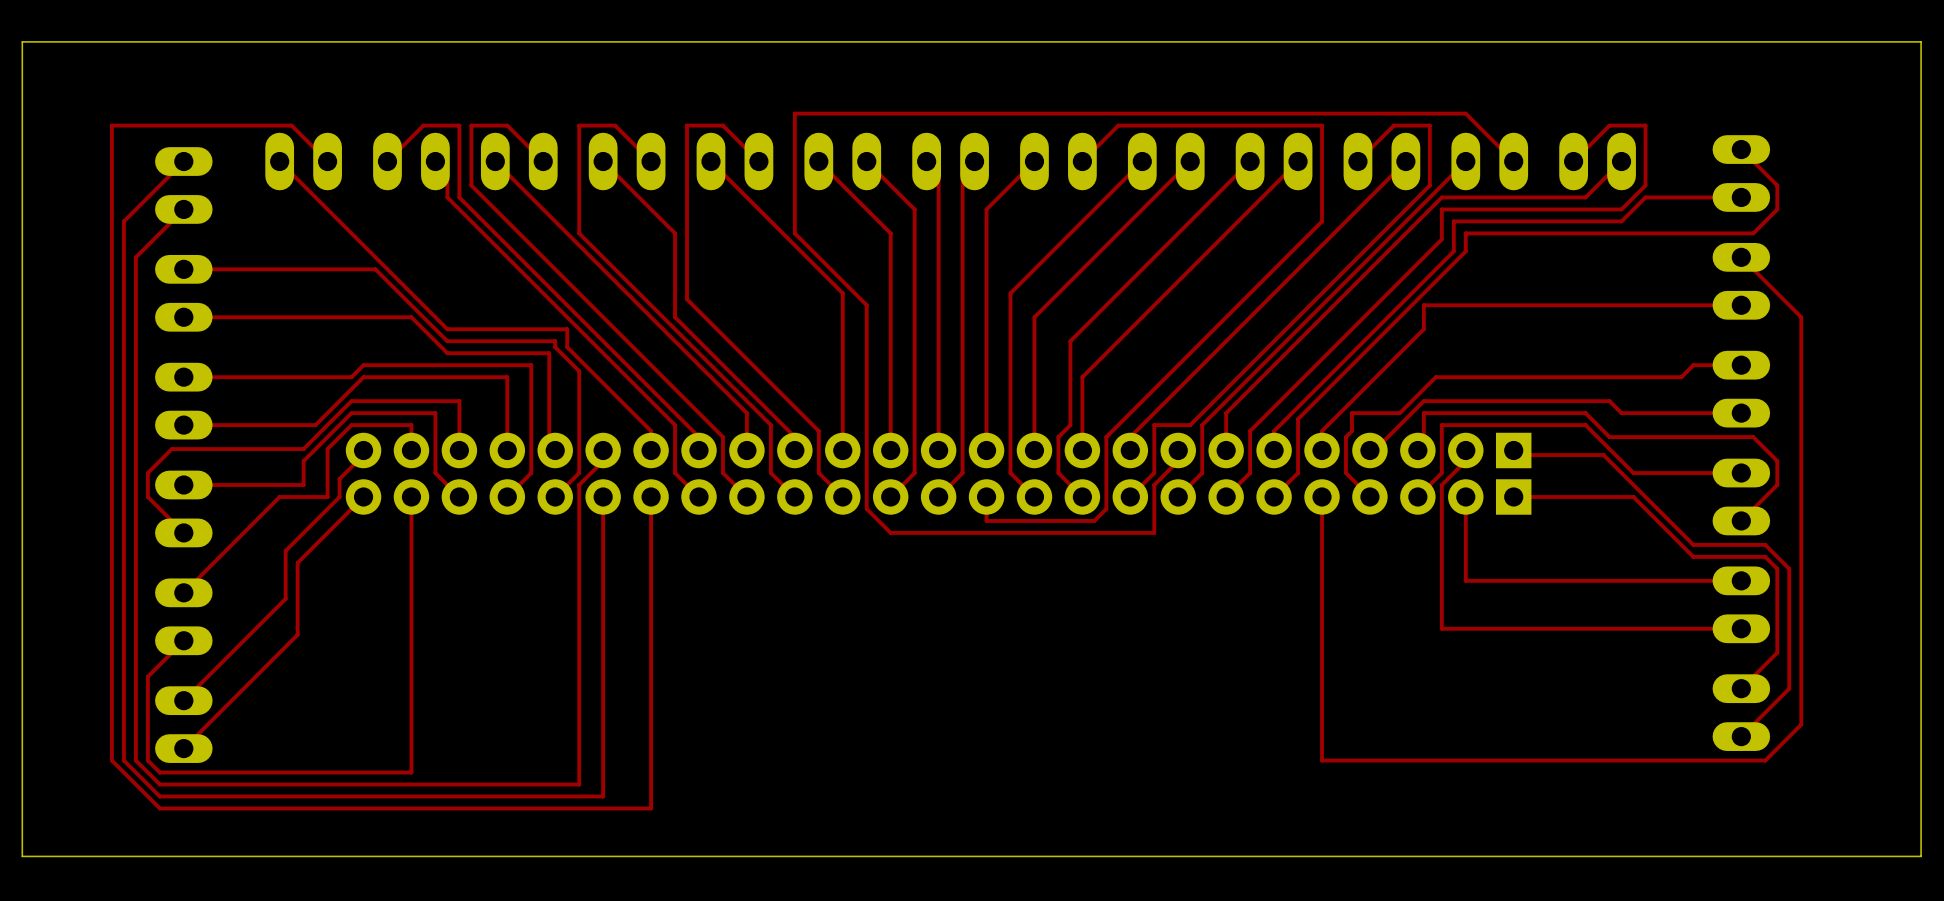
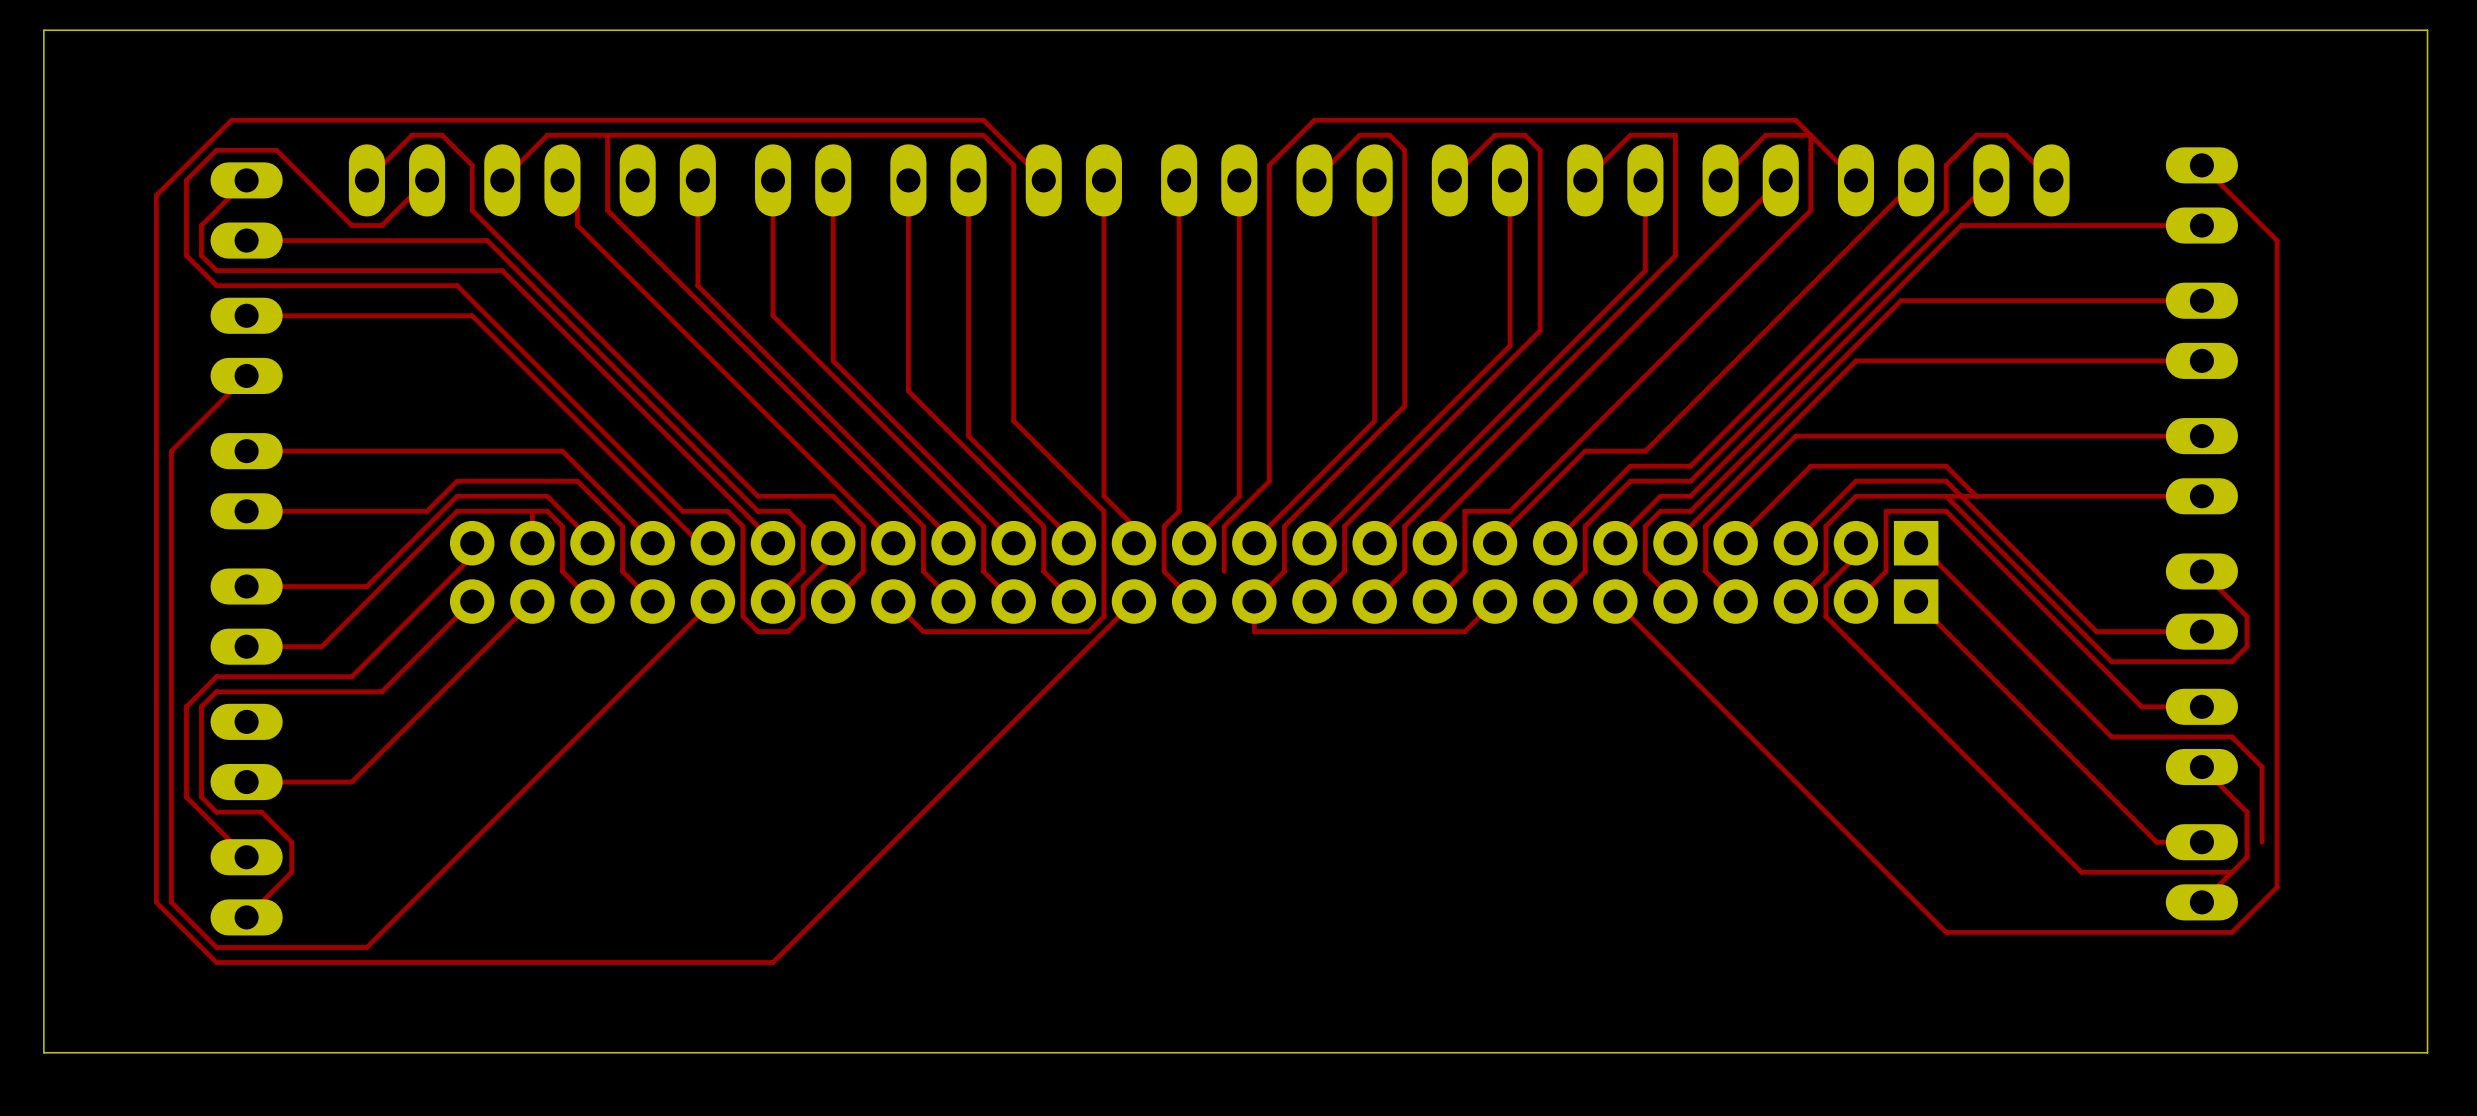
top track: (1034, 113) (794, 113) (794, 149) -> (1314, 120) (1269, 165) (1269, 481) (1224, 526)
top track: (1417, 113) (1465, 113) (1513, 161) -> (1795, 120) (1855, 180)
top track: (459, 125) (459, 197) (699, 437) (699, 449) -> (592, 135) (607, 135)
top track: (507, 125) (543, 161) -> (652, 135) (742, 135)
top track: (579, 125) (579, 233) (651, 305) -> (833, 180) (833, 360)
top track: (615, 125) (651, 161) -> (788, 135) (878, 135)
top track: (687, 125) (687, 299) (818, 431) (818, 437) -> none
top track: (722, 125) (758, 161) -> (923, 135) (983, 135) (1013, 165)
top track: (1178, 125) (1118, 125) (1082, 161) -> (1494, 135) (1449, 180)
top track: (1286, 125) (1202, 125) -> (1630, 135) (1585, 180)
top track: (279, 161) (447, 329) (567, 329) (567, 347) (651, 431) (651, 450) -> (366, 180) (412, 135) (442, 135) (472, 165) (472, 210) (758, 496) (833, 496) (863, 526)
top track: (327, 161) (291, 125) (111, 125) (111, 173) -> (427, 180) (381, 225) (351, 225) (276, 150) (216, 150) (186, 180) (186, 255) (216, 285) (457, 285) (487, 315)
top track: (495, 161) (603, 269) -> (773, 180) (773, 315)
top track: none -> (697, 180) (697, 285) (953, 541)
top track: (603, 161) (675, 233) (675, 317) (794, 437) (794, 449) -> none
top track: (710, 161) (842, 293) (842, 449) -> (908, 180) (908, 390) (1043, 526)
top track: none -> (968, 180) (968, 436) (1073, 541)
top track: (818, 161) (890, 233) (890, 437) -> (1043, 180) (983, 120) (231, 120) (156, 195)
top track: (866, 161) (914, 209) (914, 437) -> none
top track: (926, 161) (938, 173) (938, 449) -> (1179, 180) (1179, 511) (1164, 526)
top track: (974, 161) (962, 173) (962, 437) -> (1239, 180) (1239, 496) (1194, 541)
top track: (1034, 161) (986, 209) (986, 449) -> (1314, 180) (1359, 135) (1389, 135) (1404, 150) (1404, 406) (1284, 526)
top track: none -> (1374, 180) (1374, 421) (1254, 541)
top track: (1142, 161) (1010, 293) (1010, 437) -> none
top track: (1190, 161) (1034, 317) (1034, 449) -> (1510, 180) (1510, 345) (1314, 541)
top track: (1250, 161) (1070, 341) (1070, 425) -> (1525, 135) (1540, 150) (1540, 330) (1359, 511)
top track: (1298, 161) (1082, 377) (1082, 449) -> (1645, 180) (1645, 270) (1374, 541)
top track: (1465, 161) (1250, 377) -> (1916, 180) (1645, 451) (1585, 451)
top track: (1573, 161) (1609, 125) (1645, 125) (1645, 185) (1621, 209) (1441, 209) (1441, 239) (1250, 431) (1250, 437) -> (1991, 180) (1690, 481) (1630, 481) (1585, 526)
top track: (1621, 161) (1585, 197) -> (2081, 225) (2006, 225)
top track: none -> (2051, 180) (2006, 135) (1976, 135) (1946, 165) (1946, 210) (1690, 466) (1630, 466) (1555, 541)
top track: (1777, 185) (1777, 209) (1753, 233) (1465, 233) (1465, 251) (1298, 419) (1298, 437) -> (2201, 300) (1901, 300) (1690, 511) (1660, 511) (1645, 526)
top track: (147, 197) (123, 221) (123, 377) -> (246, 375) (171, 451)
top track: (1549, 197) (1441, 197) (1226, 413) (1226, 449) -> (1961, 225) (1690, 496) (1660, 496) (1615, 541)
top track: (1645, 197) (1621, 221) (1453, 221) (1453, 251) (1274, 431) (1274, 449) -> none
top track: (183, 209) (135, 257) (135, 580) -> (246, 240) (487, 240) (758, 511) (788, 511) (803, 526) (803, 571) (773, 601)
top track: (794, 233) (866, 305) -> (1103, 180) (1103, 360)
top track: none -> (1013, 270) (1013, 421) (1103, 511)
top track: (1741, 257) (1801, 317) -> (2247, 210) (2277, 240) (2277, 375)
top track: (375, 269) (363, 269) -> (532, 375) (472, 315)
top track: (1465, 305) (1423, 305) (1423, 329) (1322, 431) (1322, 449) -> (1855, 360) (1675, 541)
top track: (411, 317) (183, 317) -> none
top track: (447, 341) (555, 341) (555, 347) (579, 371) (579, 437) -> (577, 406) (682, 511) (727, 511) (742, 526)
top track: (447, 353) (549, 353) (549, 443) (555, 450) -> (577, 421) (712, 556) (712, 543)
top track: (1693, 365) (1681, 377) (1435, 377) (1399, 413) (1351, 413) (1351, 431) -> (2141, 436) (1795, 436) (1713, 518)
top track: (351, 377) (363, 365) (531, 365) (531, 473) (507, 496) -> (577, 481) (622, 526) (622, 571) (652, 601)
top track: (363, 377) (315, 425) -> (472, 451) (457, 451)
top track: (435, 377) (507, 377) (507, 449) -> (562, 451) (652, 541)
top track: (447, 401) (459, 401) (459, 449) -> (547, 496) (592, 541)
top track: (1465, 401) (1423, 401) (1369, 455) (1369, 450) -> (1976, 496) (1946, 466) (1810, 466) (1735, 543)
top track: (1537, 401) (1609, 401) (1621, 413) -> (2006, 496) (2051, 496)
top track: (423, 413) (435, 413) (435, 437) -> (532, 511) (547, 511) (562, 526)
top track: (746, 413) (746, 449) -> (953, 496) (983, 526)
top track: (866, 413) (866, 425) -> (1103, 496) (1134, 526)
top track: (1465, 413) (1423, 413) (1423, 443) -> (1855, 481) (1803, 533)
top track: (1585, 413) (1609, 437) (1753, 437) (1777, 461) (1777, 485) (1741, 520) -> (2096, 631) (2201, 631)
top track: (327, 425) (303, 449) (171, 449) (147, 473) (147, 496) (183, 532) -> (427, 511) (412, 511)
top track: (675, 425) (675, 437) -> (863, 511) (893, 541)
top track: (770, 425) (770, 437) -> (983, 511) (1013, 541)
top track: (1202, 425) (1202, 473) (1178, 496) -> (1525, 511) (1494, 543)
top track: (1489, 425) (1441, 425) (1441, 437) -> (1855, 496) (1825, 526)
top track: none -> (1886, 511) (1886, 571) (1855, 601)
top track: (1537, 425) (1585, 425) (1633, 473) (1741, 473) -> none
top track: (327, 449) (327, 496) (279, 496) -> (427, 541) (366, 601)
top track: (603, 450) (603, 461) (579, 485) -> (773, 543) (502, 270) (216, 270) (201, 255) (201, 225)
top track: none -> (833, 543) (833, 556) (803, 586) (803, 616) (788, 631) (758, 631) (742, 616)
top track: (1178, 450) (1178, 461) (1154, 485) (1154, 532) (890, 532) (866, 508) -> (893, 601) (923, 631) (1088, 631) (1103, 616)
top track: (1513, 450) (1513, 455) (1603, 455) (1693, 544) -> (1946, 496) (2111, 661) (2141, 661)
top track: none -> (1916, 543) (1916, 541) (2111, 736) (2231, 736) (2262, 767)
top track: (363, 455) (339, 479) (339, 496) (285, 550) (285, 598) (183, 700) -> (472, 548) (472, 556) (351, 676) (216, 676) (186, 706)
top track: (303, 461) (303, 485) (279, 485) -> (397, 556) (366, 586)
top track: (579, 473) (555, 496) -> (742, 571) (742, 586)
top track: (675, 473) (699, 496) -> (863, 571) (833, 601)
top track: (914, 473) (890, 496) -> (1164, 571) (1194, 601)
top track: (962, 473) (938, 496) -> none
top track: (1010, 473) (1034, 496) -> (1284, 571) (1254, 601)
top track: (1058, 473) (1082, 496) -> (1344, 571) (1314, 601)
top track: (1106, 473) (1106, 508) (1094, 520) -> (1404, 571) (1374, 601)
top track: (1298, 473) (1274, 496) -> (1645, 571) (1675, 601)
top track: (411, 496) (411, 772) (279, 772) -> (712, 601) (366, 947)
top track: none -> (532, 601) (351, 782) (246, 782)
top track: (603, 496) (603, 796) (159, 796) (123, 760) (123, 736) -> none
top track: (651, 496) (651, 808) (159, 808) (111, 760) (111, 736) -> (186, 932) (156, 902)
top track: none -> (1494, 601) (1464, 631) (1389, 631)
top track: (1322, 496) (1322, 760) (1537, 760) -> (1615, 601) (1946, 932)
top track: (1465, 496) (1465, 580) (1693, 580) -> (1946, 511) (2141, 706)
top track: (1633, 496) (1513, 496) -> (2066, 601) (1946, 481)
top track: (579, 508) (579, 784) -> (1134, 601) (773, 962) (742, 962)
top track: (1441, 508) (1441, 628) (1741, 628) -> (1825, 616) (2081, 872) (2231, 872)
top track: (1657, 520) (1693, 556) (1765, 556) (1777, 568) (1777, 652) (1741, 688) -> (1916, 601) (2156, 842) (2201, 842)
top track: (243, 532) (183, 592) -> (321, 646) (246, 646)
top track: (1765, 544) (1789, 568) (1789, 628) -> (2231, 661) (2247, 646) (2247, 616) (2201, 571)
top track: (297, 562) (297, 634) (219, 712) -> (389, 684) (381, 691) (216, 691) (201, 706) (201, 797) (216, 812) (261, 812) (291, 842) (291, 872)
top track: (183, 640) (147, 676) (147, 760) -> (171, 902) (201, 932)
top track: (135, 652) (135, 760) -> (186, 797) (246, 857)
top track: (1789, 688) (1777, 700) -> (2201, 767) (2247, 812) (2247, 857)

